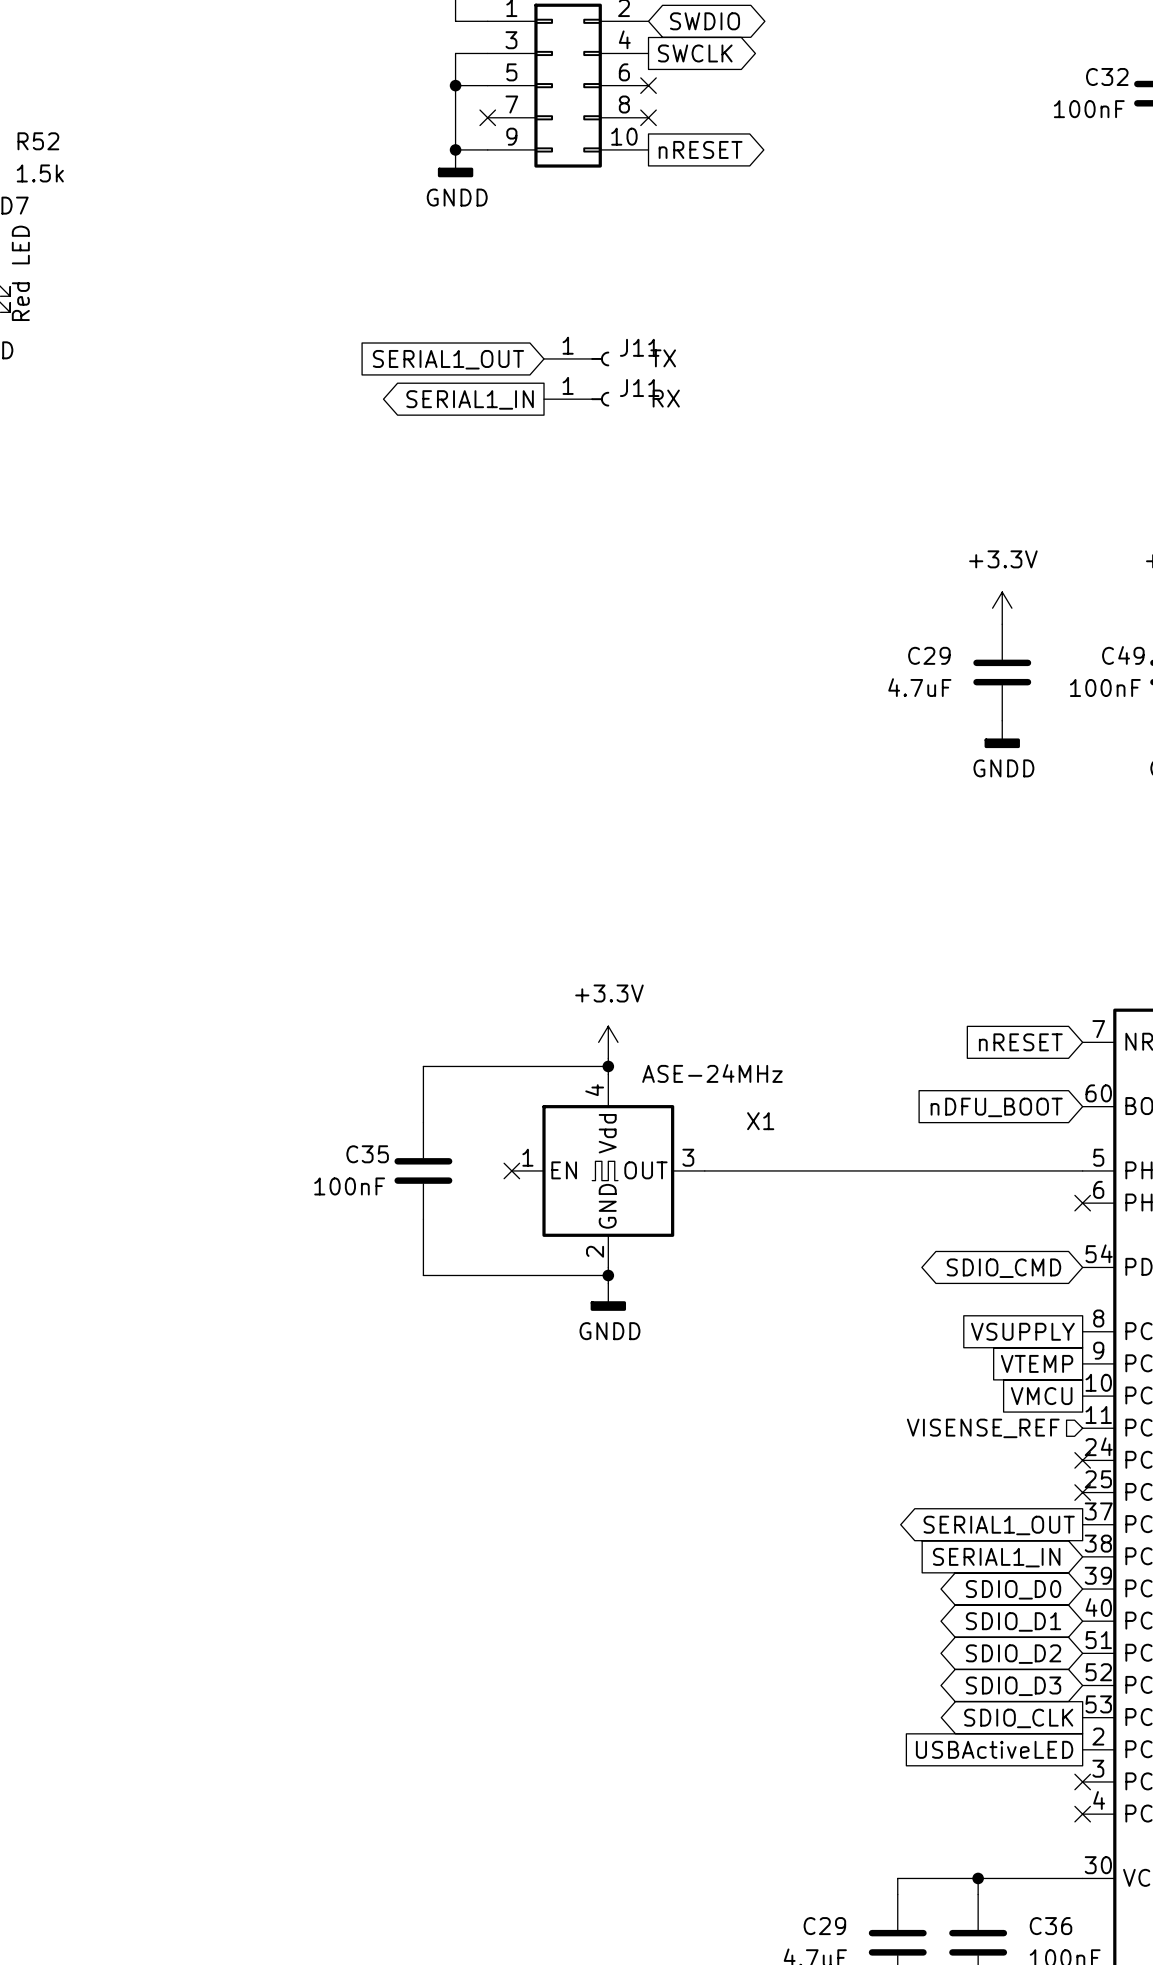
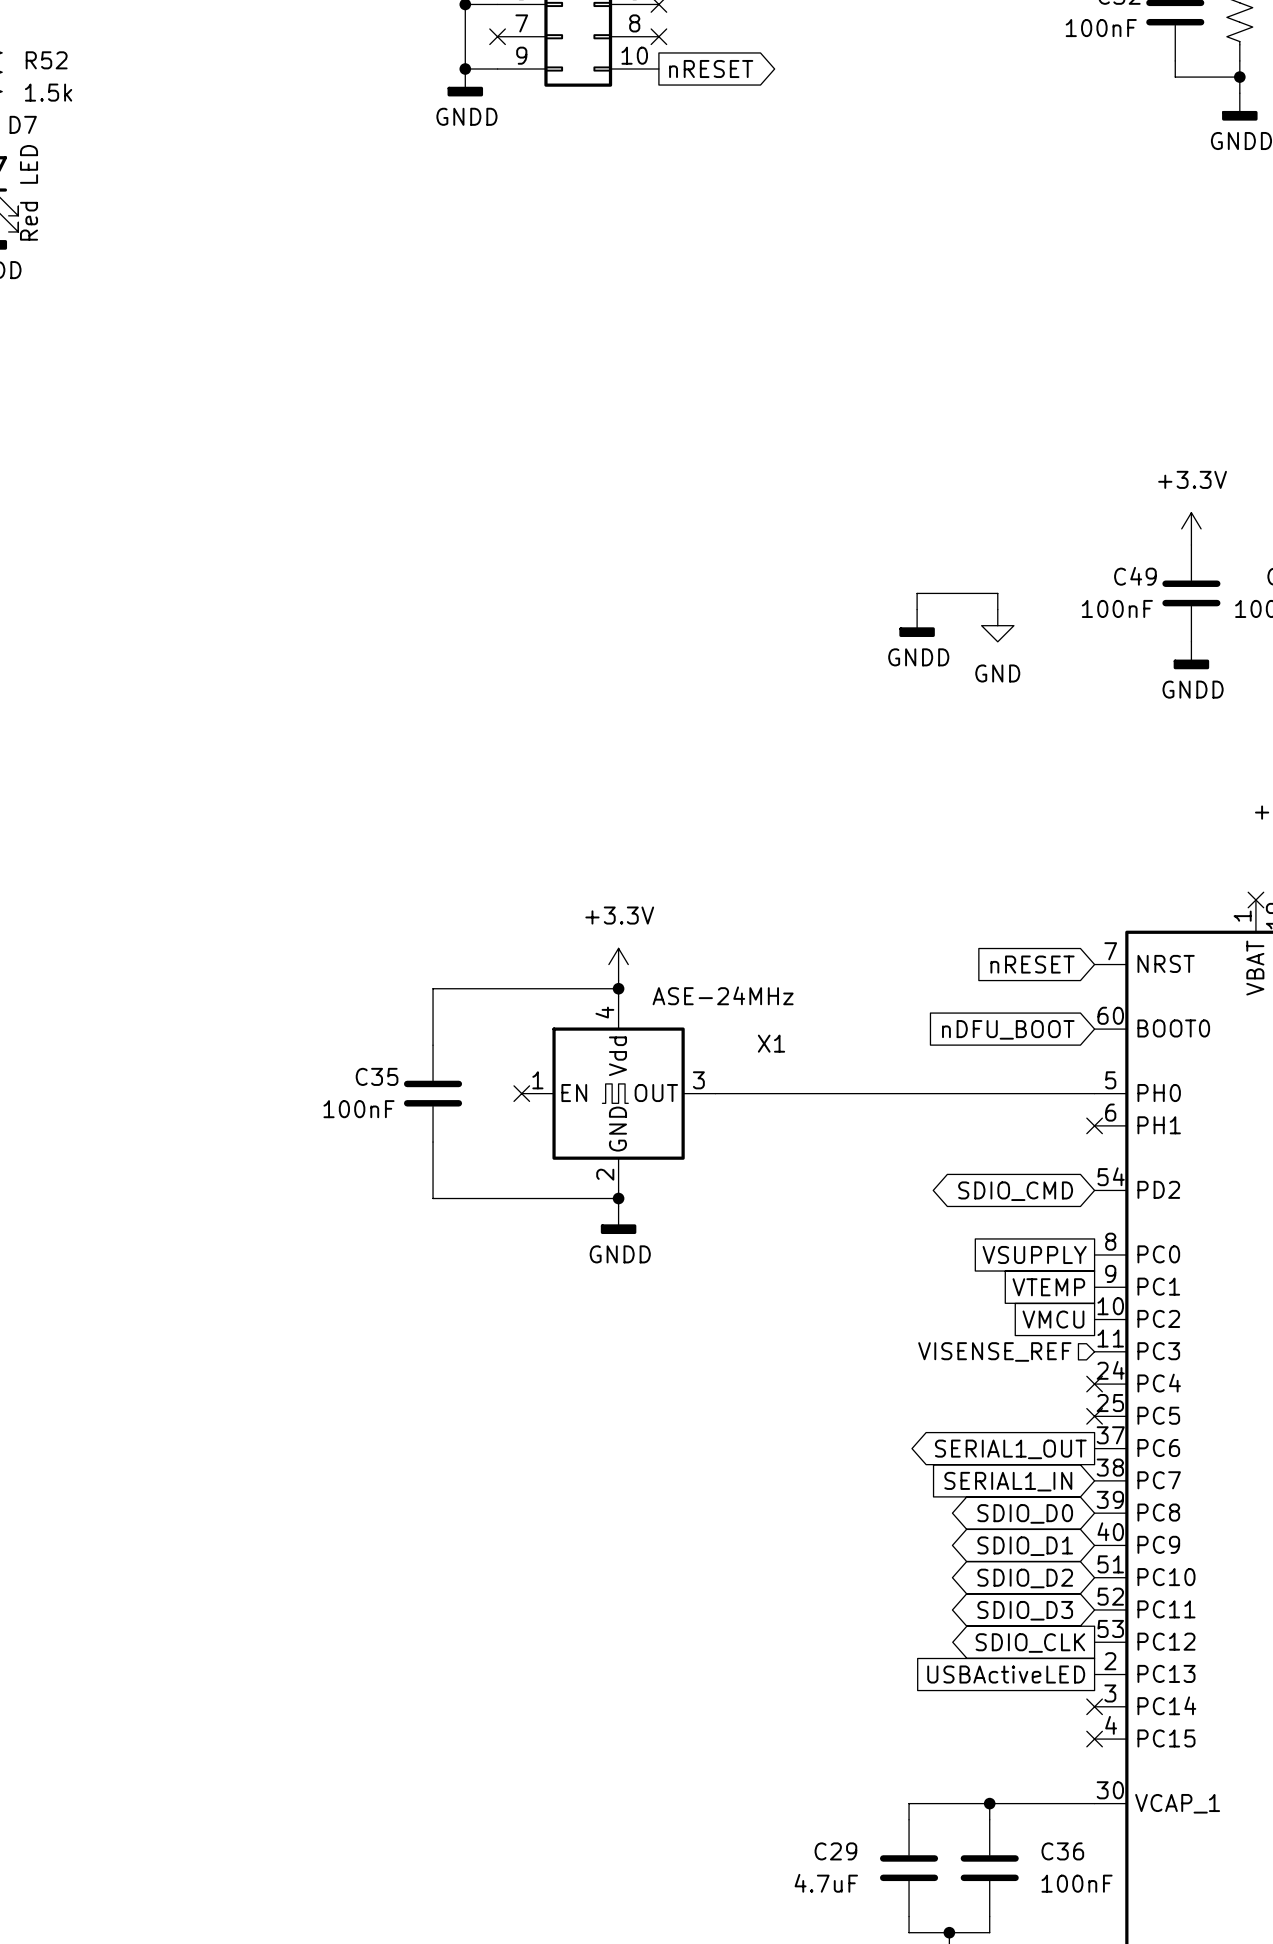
J11: TX (576, 358) -> none
global label: SERIAL1_OUT (448, 359) -> none
global label: SERIAL1_IN (470, 399) -> none
J11: RX (576, 399) -> none
power symbol: +3.3V (1002, 608) -> none
C29: 4.7uF (1002, 672) -> none
wire: none -> (917, 609) (917, 593) (997, 593) (997, 609)
power symbol: none -> GND (997, 625)
power symbol position: GNDD (1002, 734) -> GNDD (917, 623)

